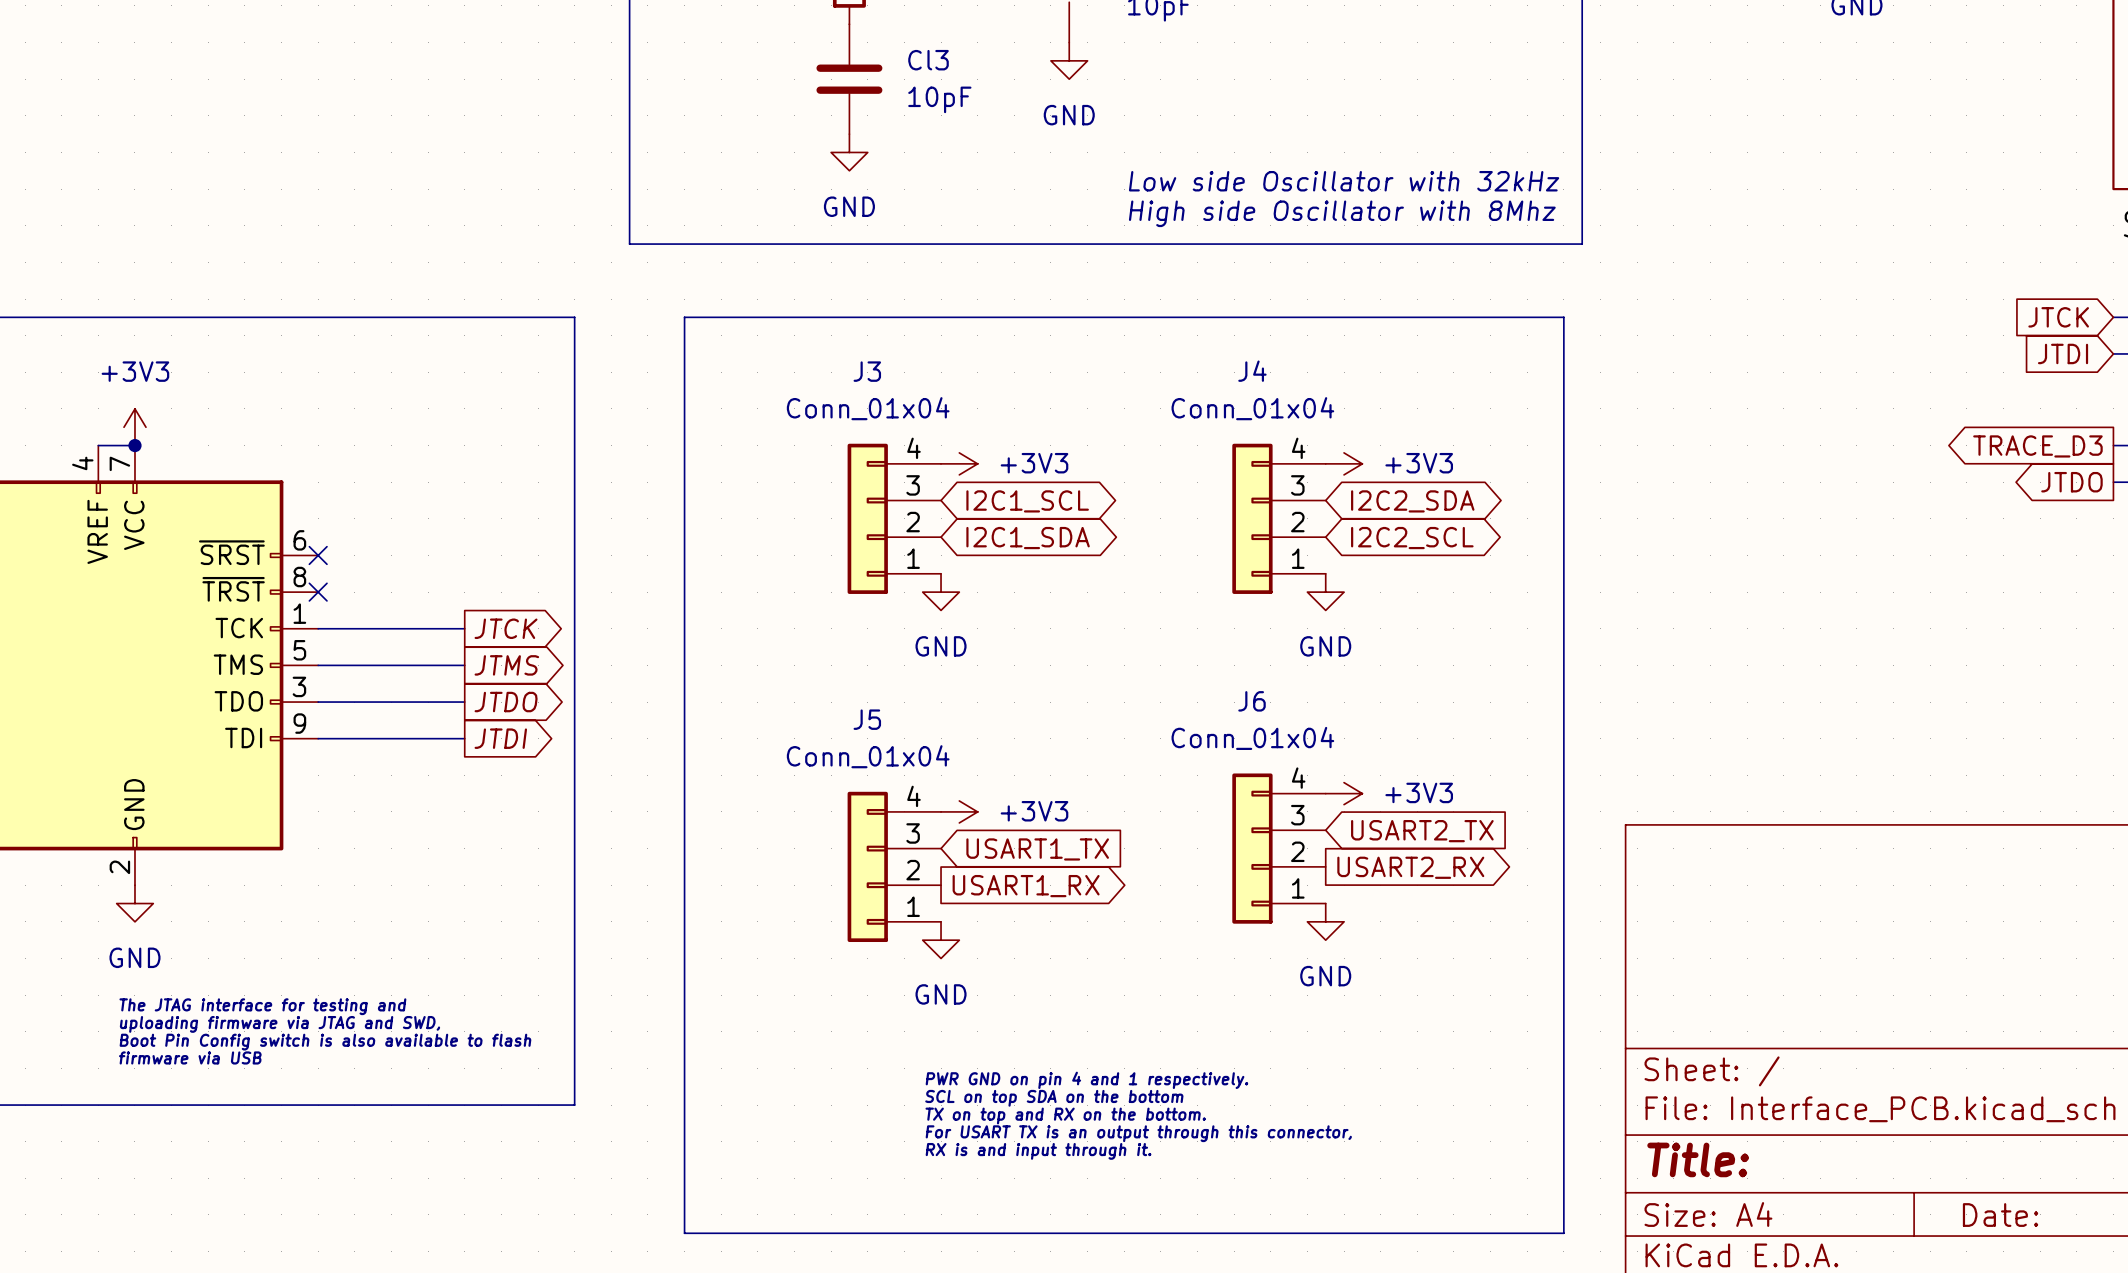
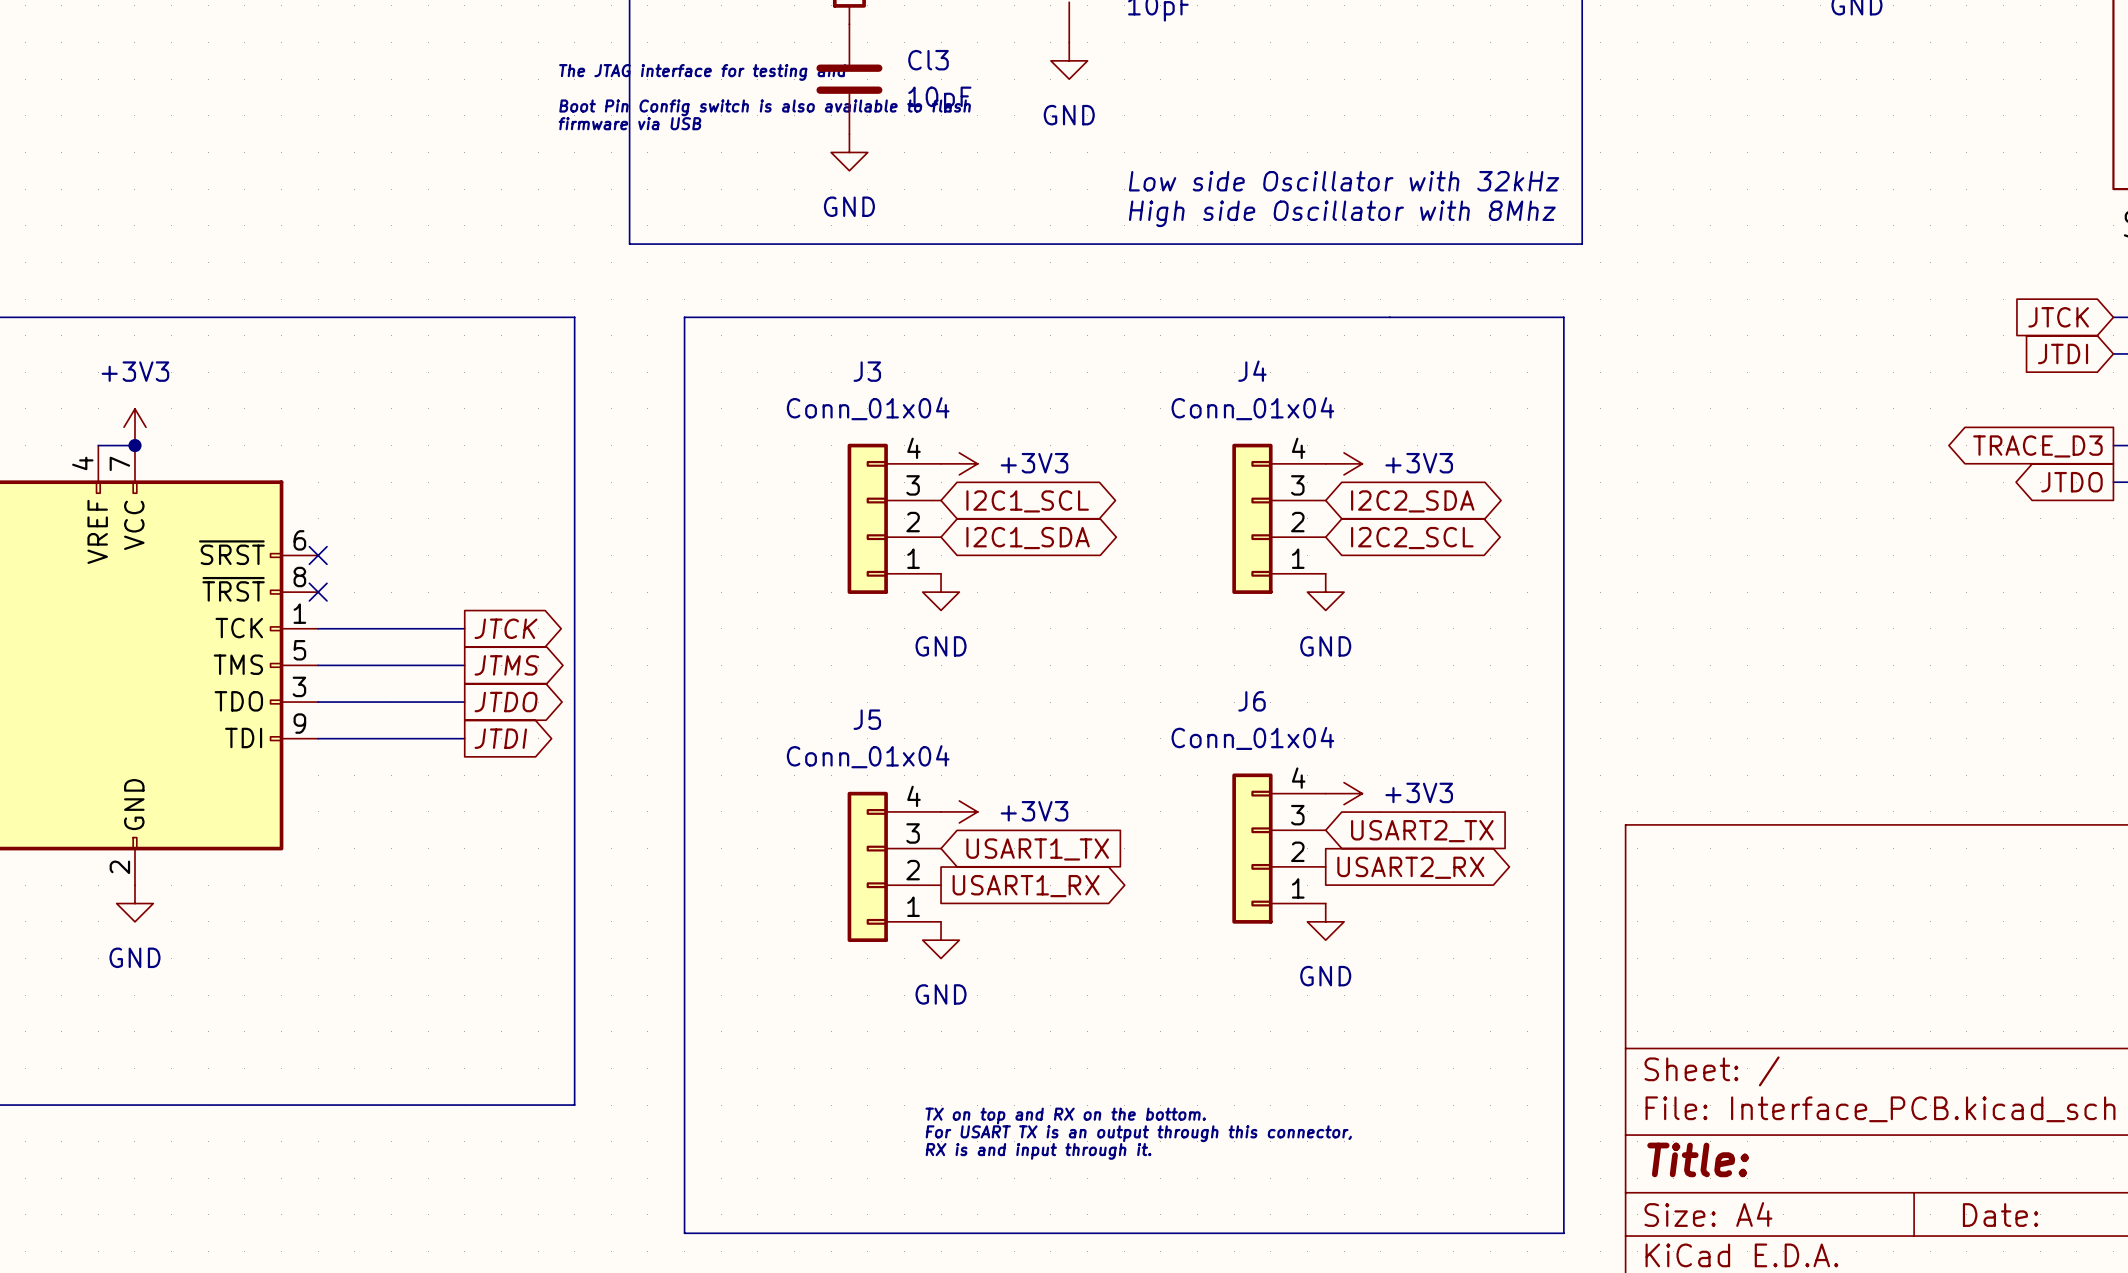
text: none -> The JTAG interface for testing and (702, 72)
text: none -> Boot Pin Config switch is also available to flash (765, 107)
text: none -> firmware via USB (629, 123)
text: The JTAG interface for testing and (262, 1006) -> none
text: uploading firmware via JTAG and SWD, (279, 1024) -> none
text: Boot Pin Config switch is also available to flash (325, 1042) -> none
text: firmware via USB (190, 1057) -> none
text: PWR GND on pin 4 and 1 respectively. (1086, 1080) -> none
text: SCL on top SDA on the bottom (1054, 1098) -> none

